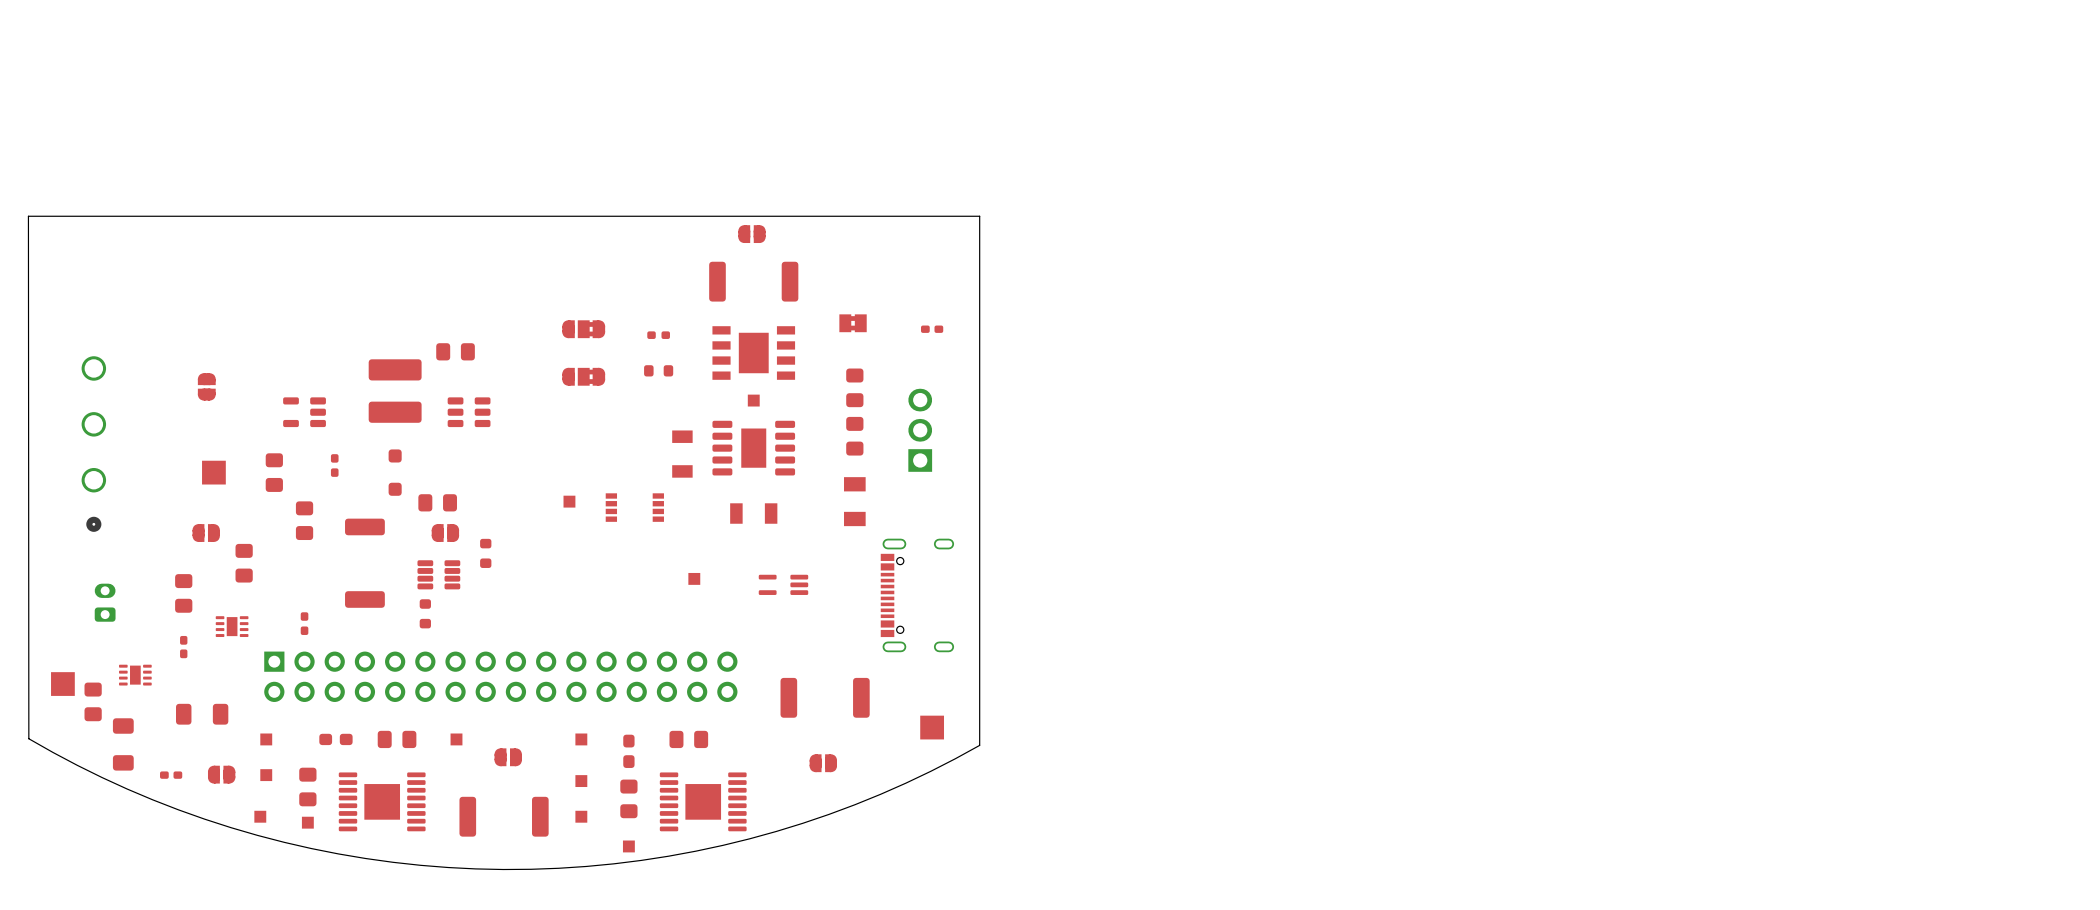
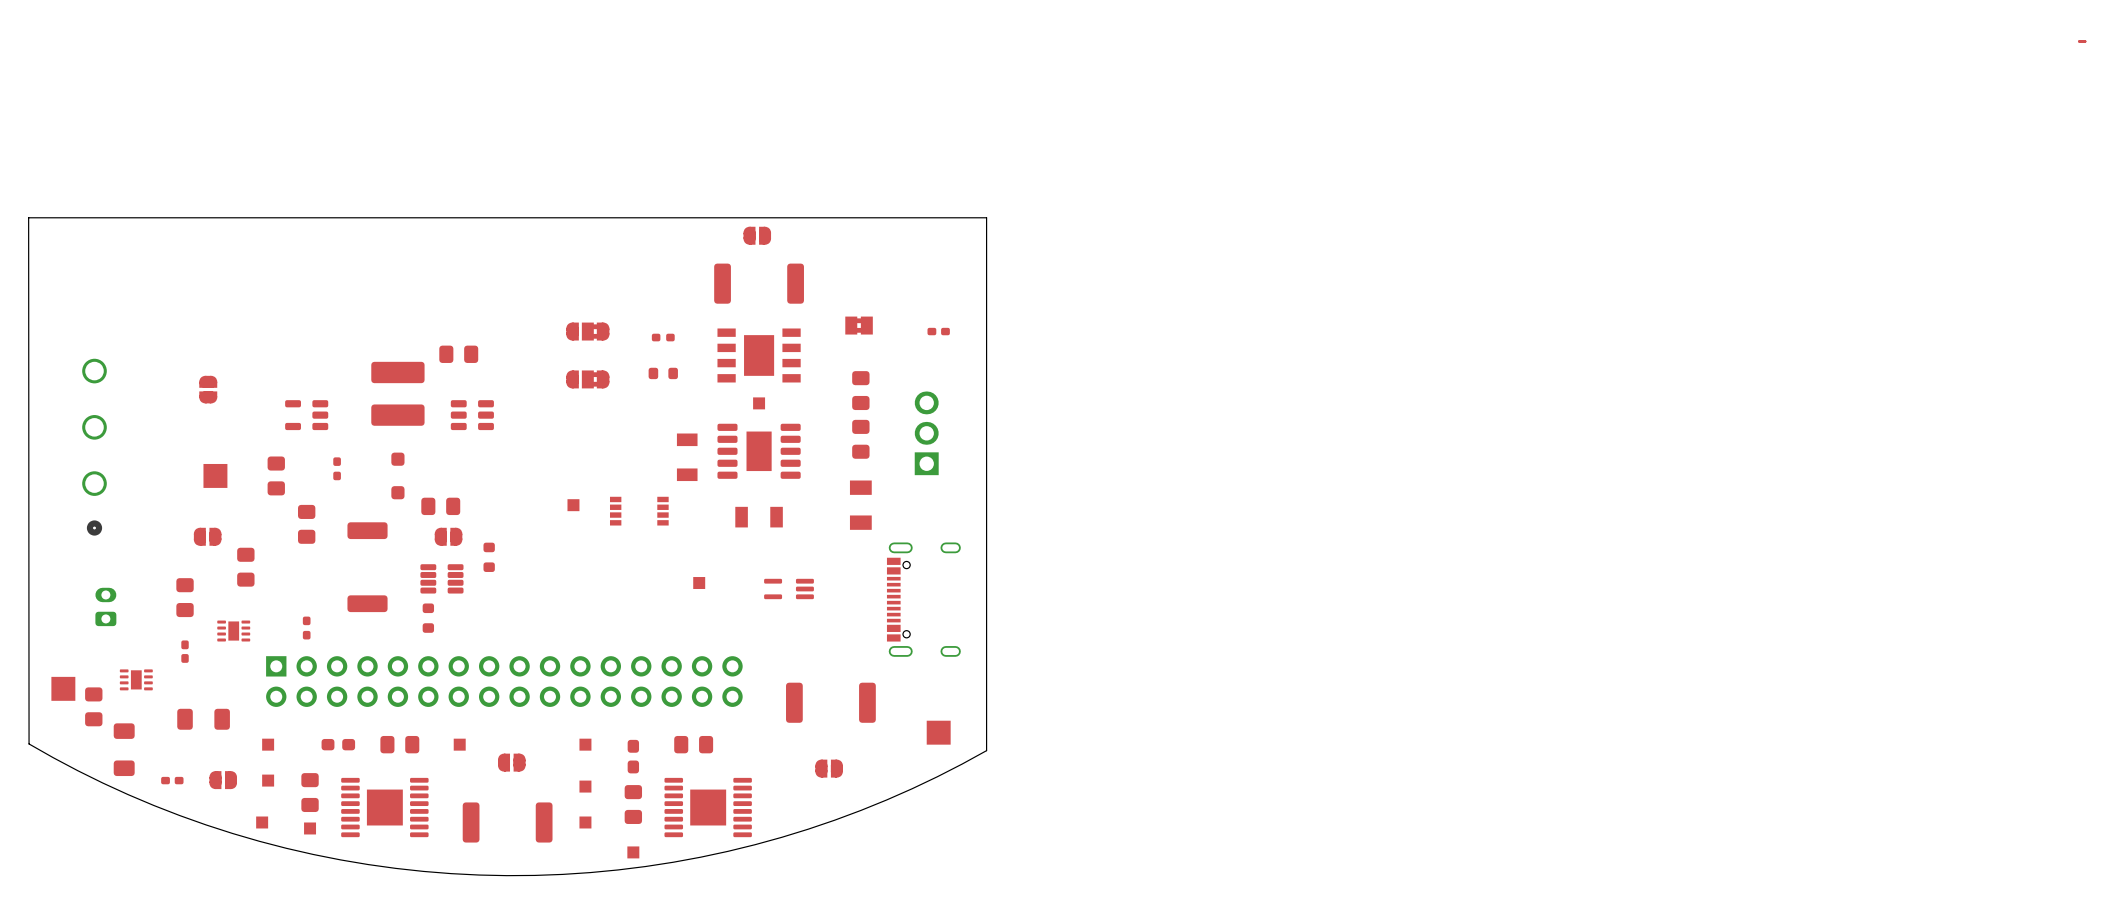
top track: none -> (2085, 41) (2079, 41)

